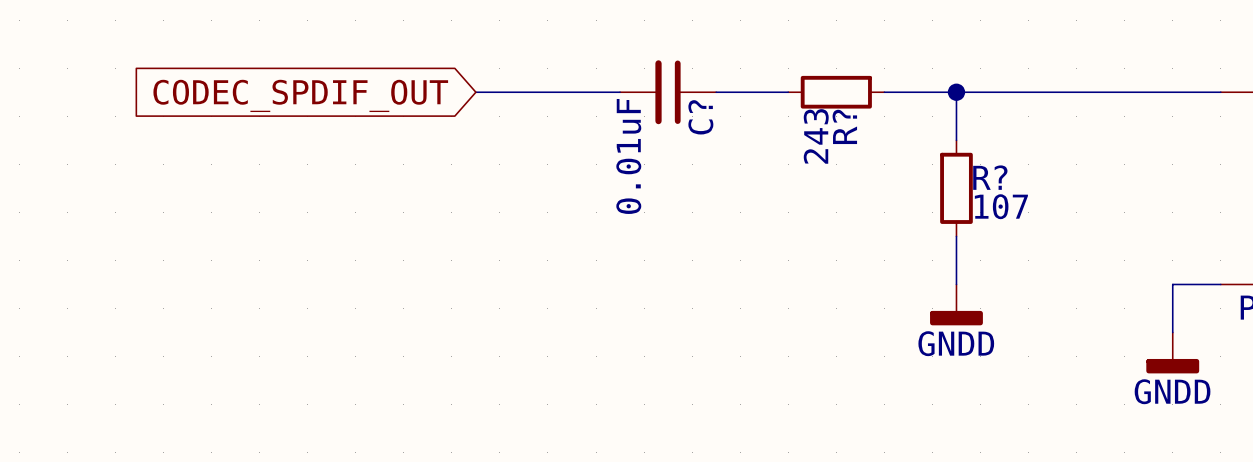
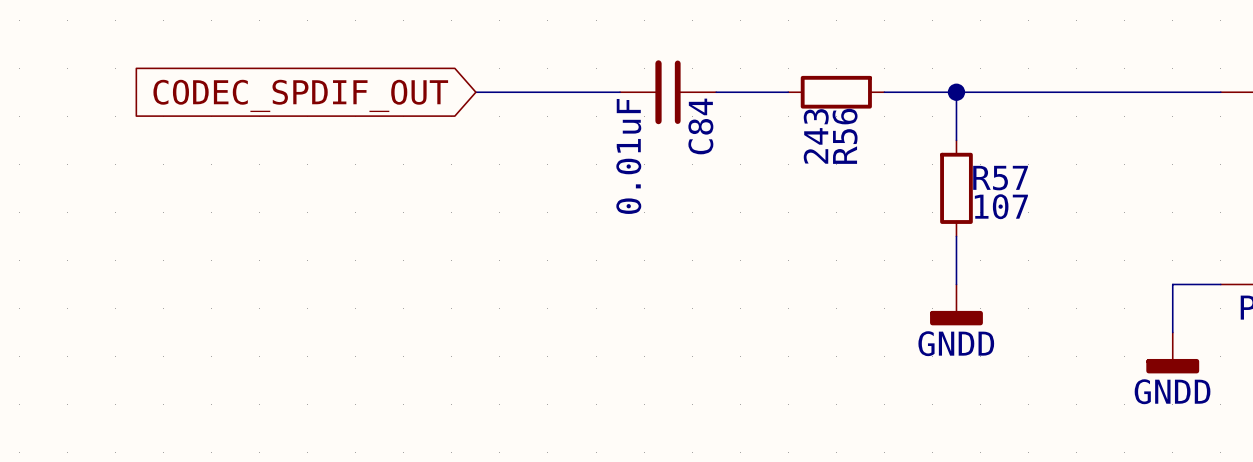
C? name: C? (700, 117) -> C84 (700, 126)
R? name: R? (844, 126) -> R56 (845, 136)
R? name: R? (990, 177) -> R57 (1000, 178)

